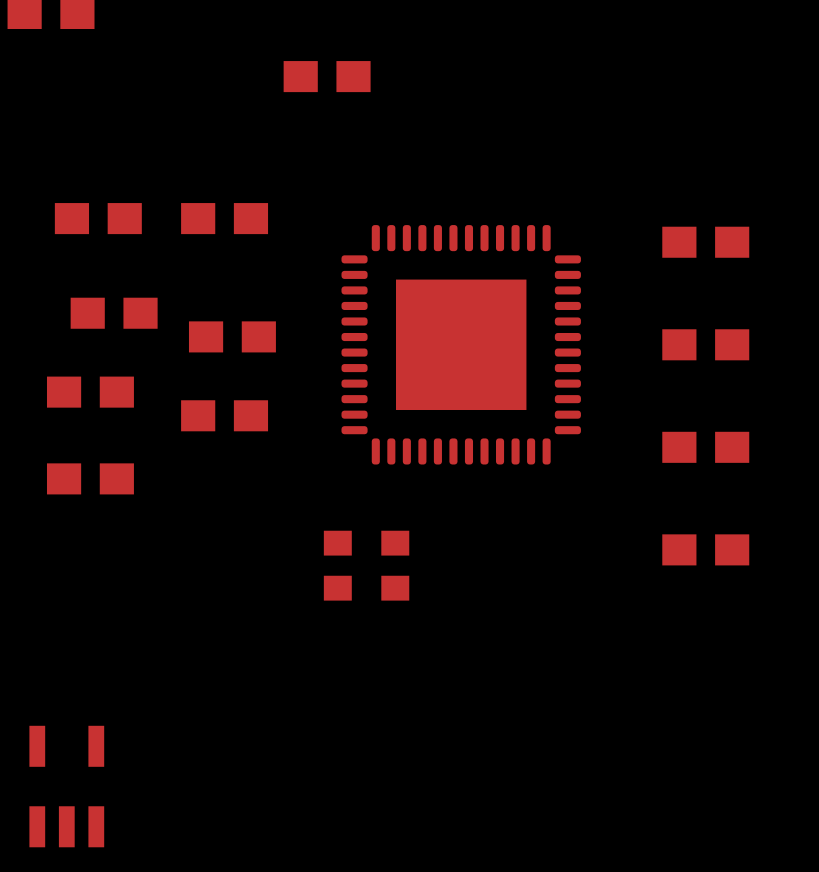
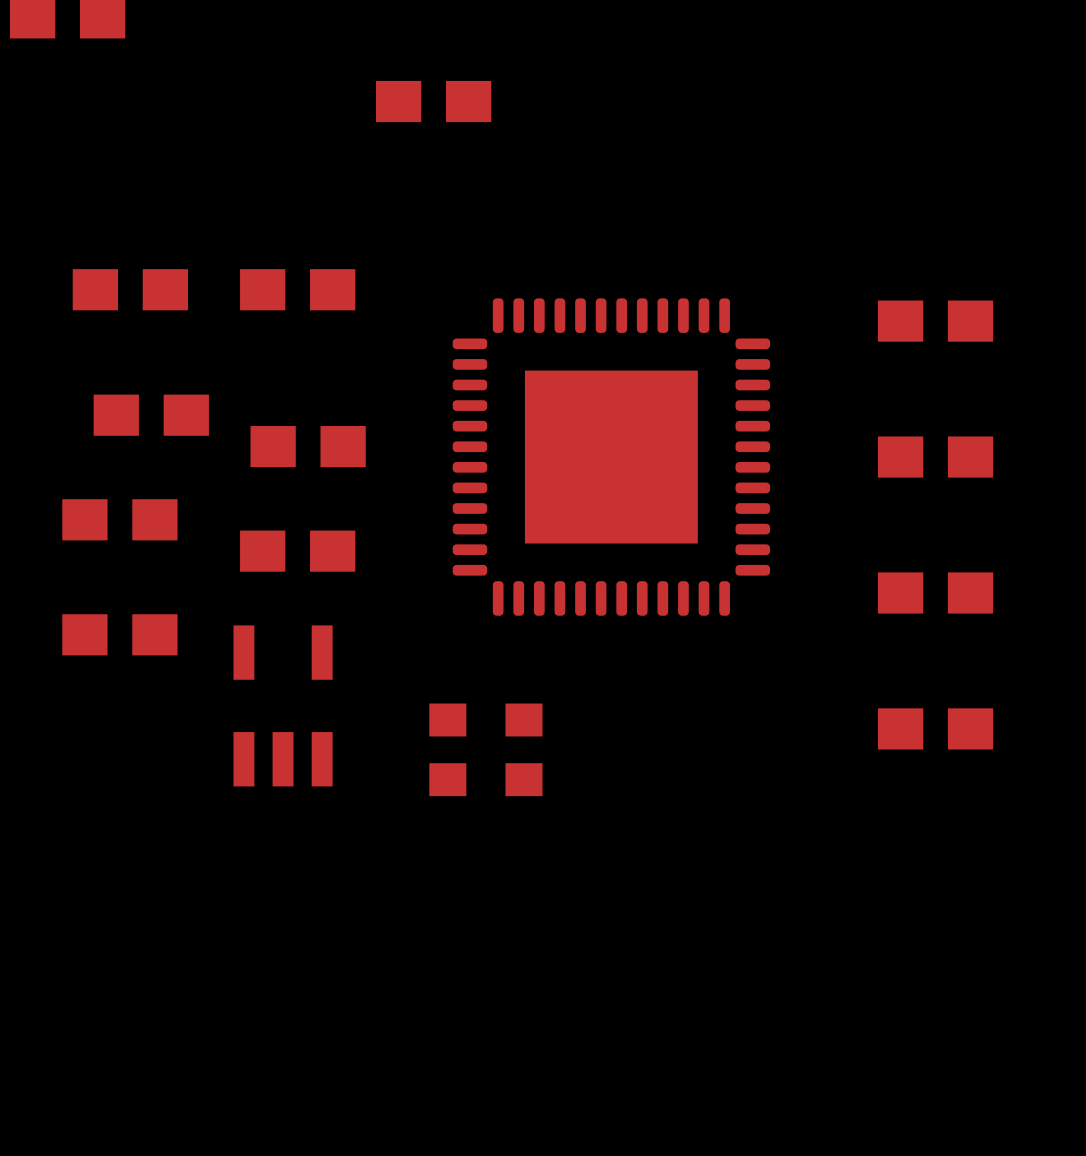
part position: (66, 786) -> (283, 705)

